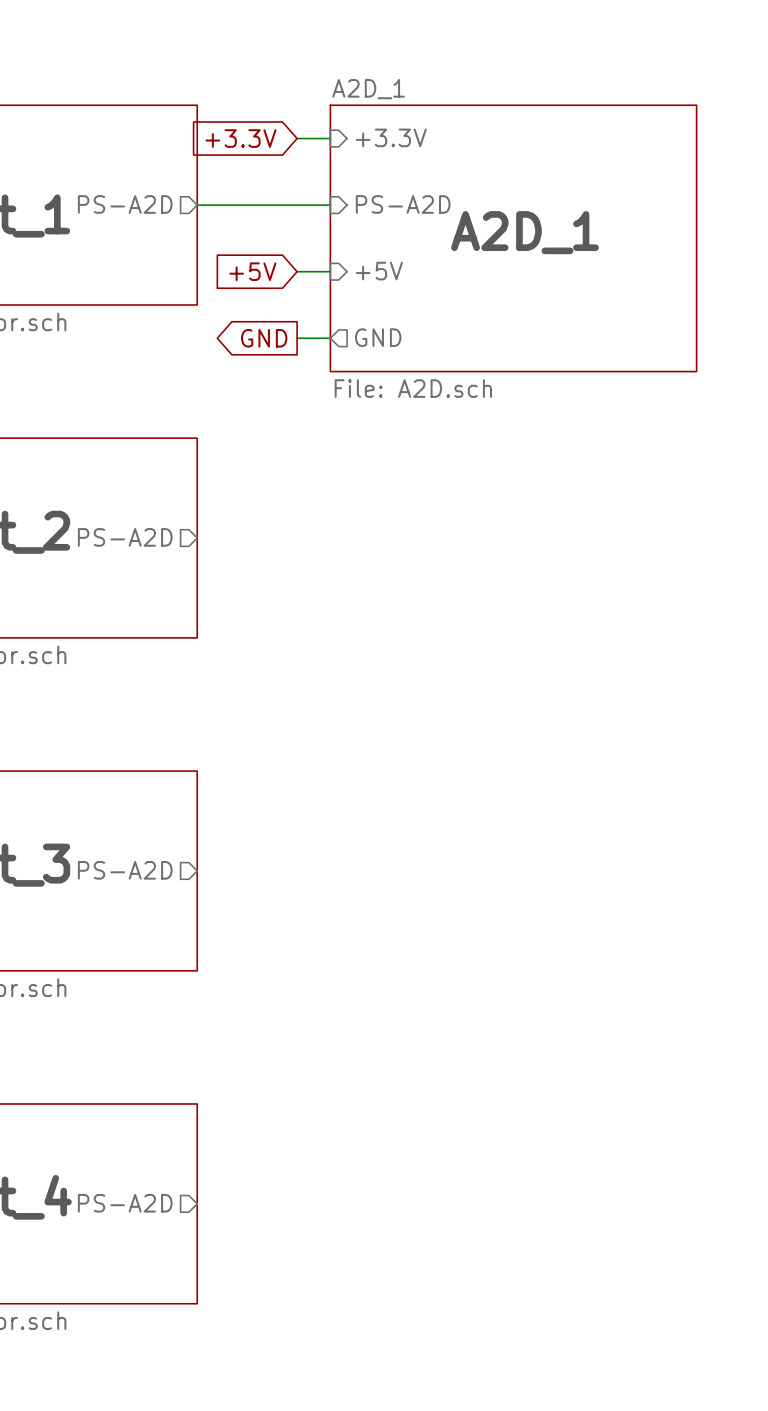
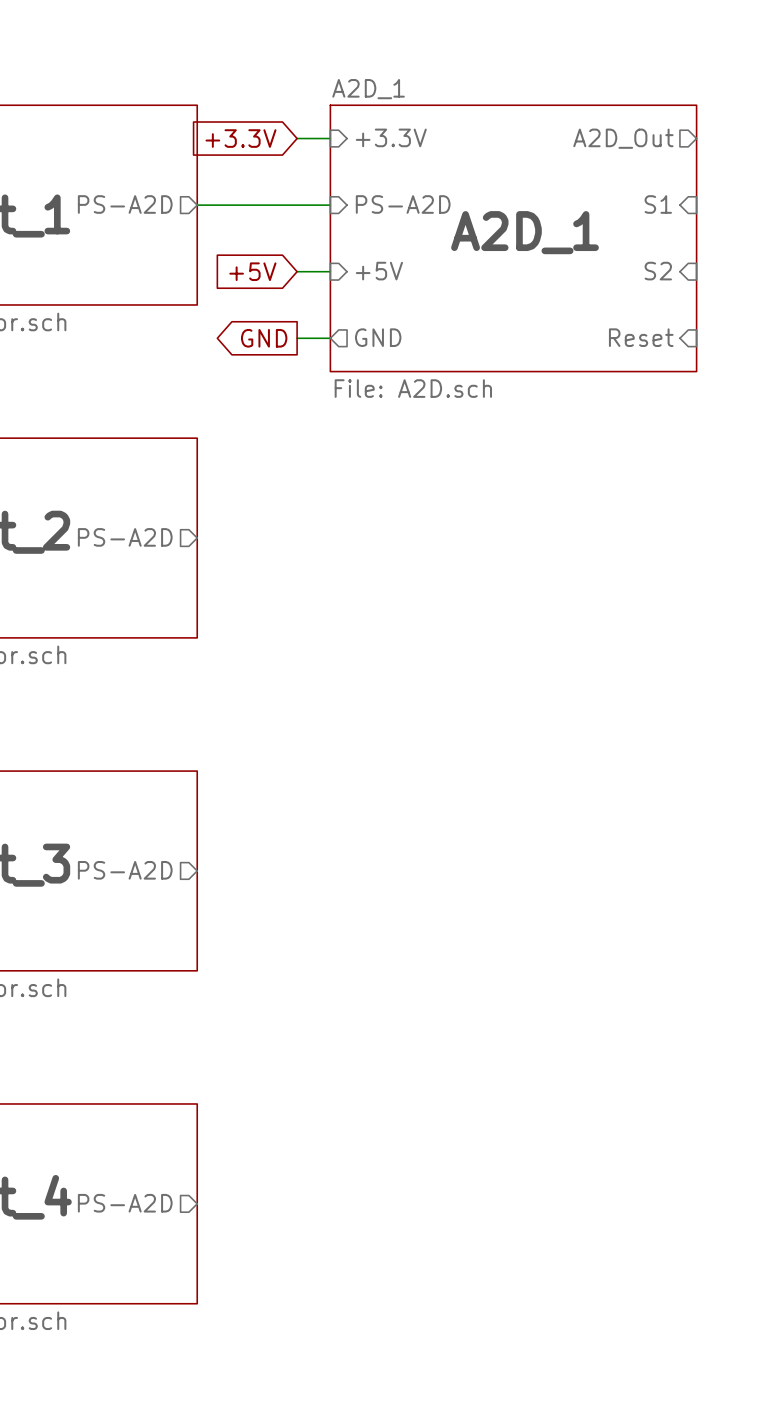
sheet pin: none -> A2D_Out (623, 138)
sheet pin: none -> S1 (658, 204)
sheet pin: none -> S2 (658, 271)
sheet pin: none -> Reset (641, 337)

